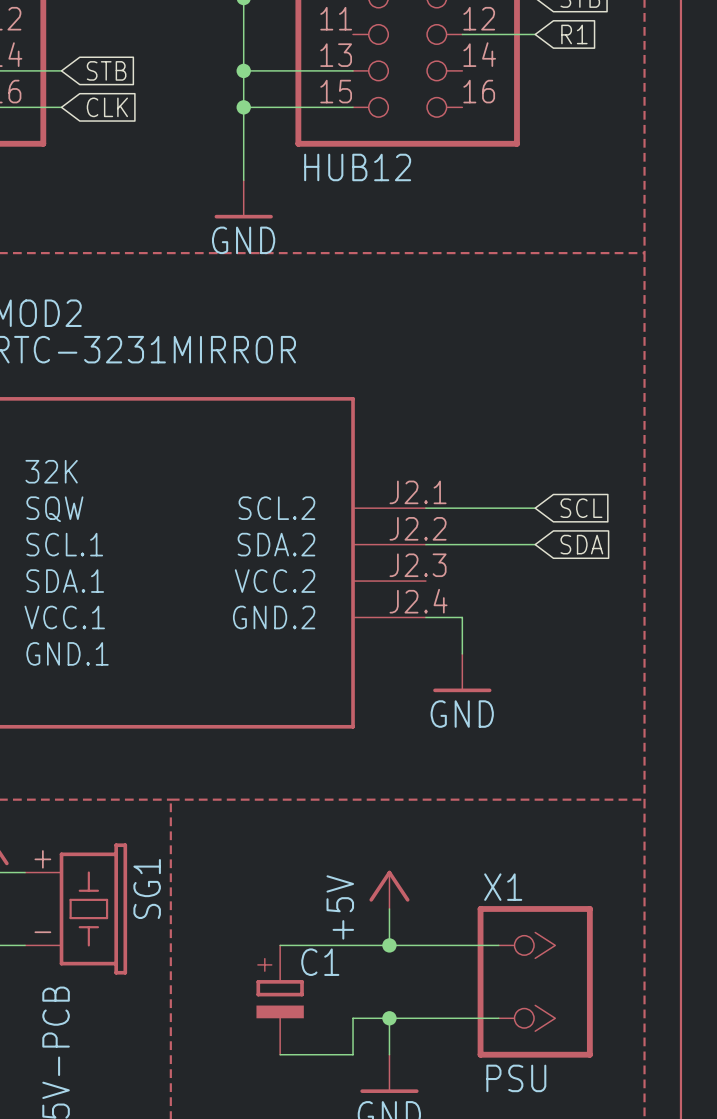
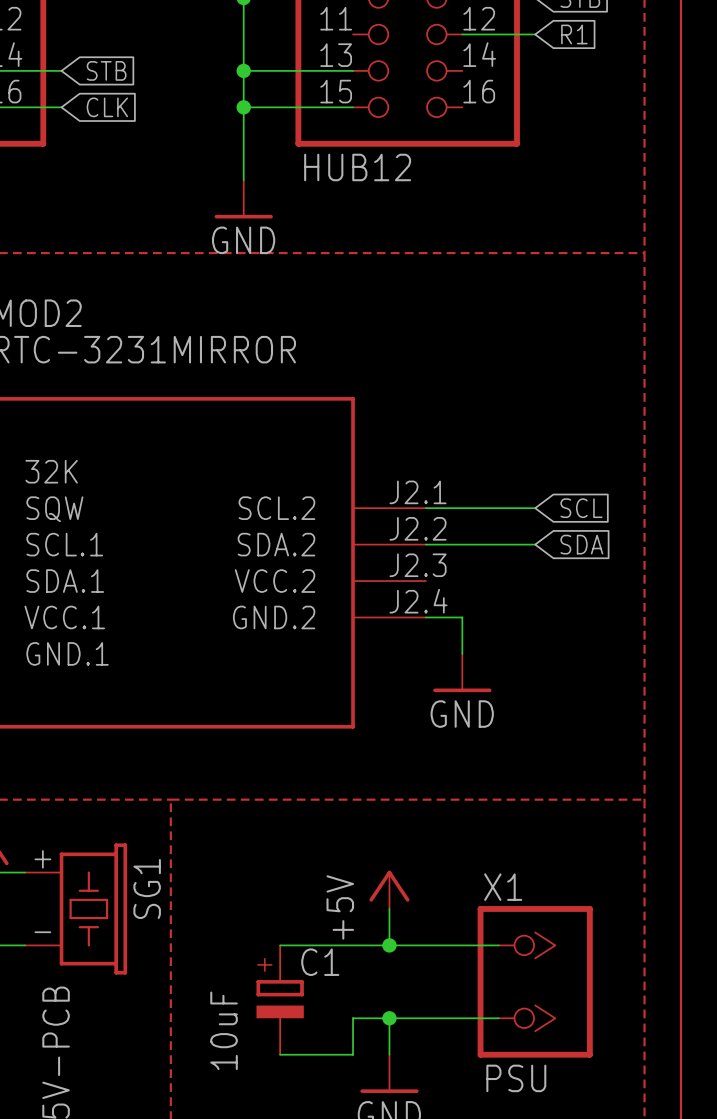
C1 value: none -> 10uF (224, 1030)

